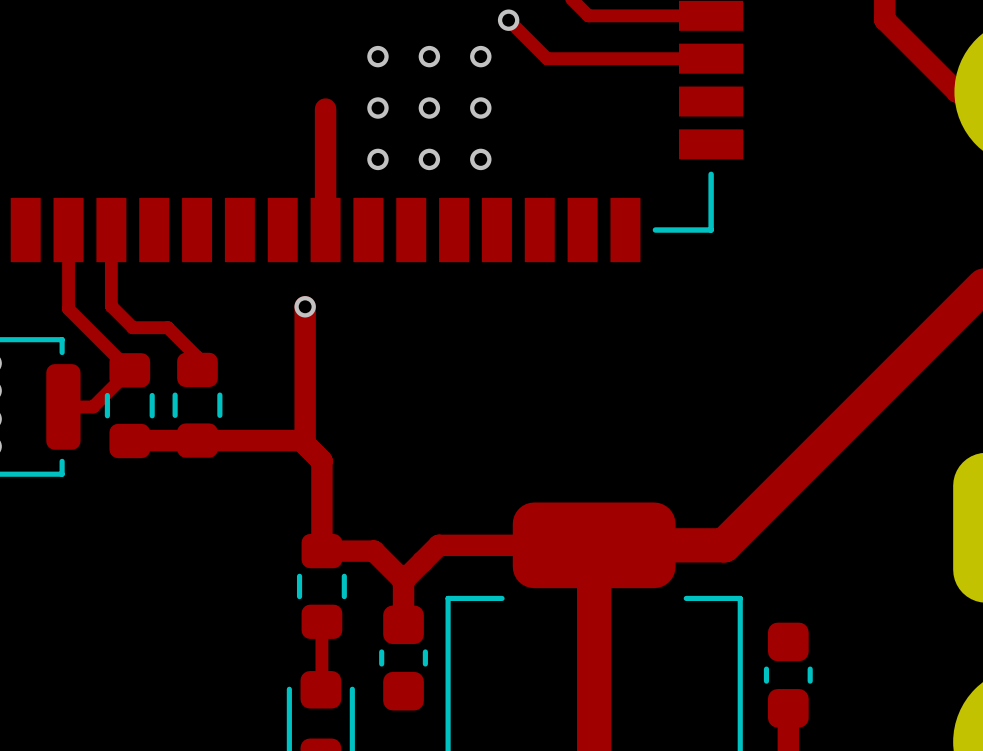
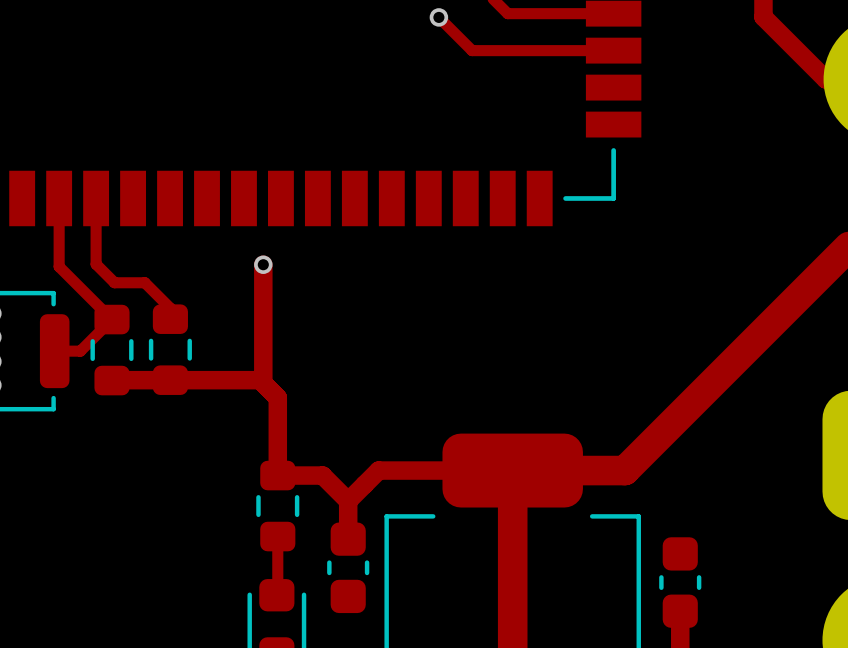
via: (377, 56) -> none
via: (429, 56) -> none
via: (480, 56) -> none
via: (377, 108) -> none
via: (429, 108) -> none
via: (480, 108) -> none
track: (325, 109) (325, 230) -> none
via: (377, 159) -> none
via: (429, 159) -> none
via: (480, 159) -> none

